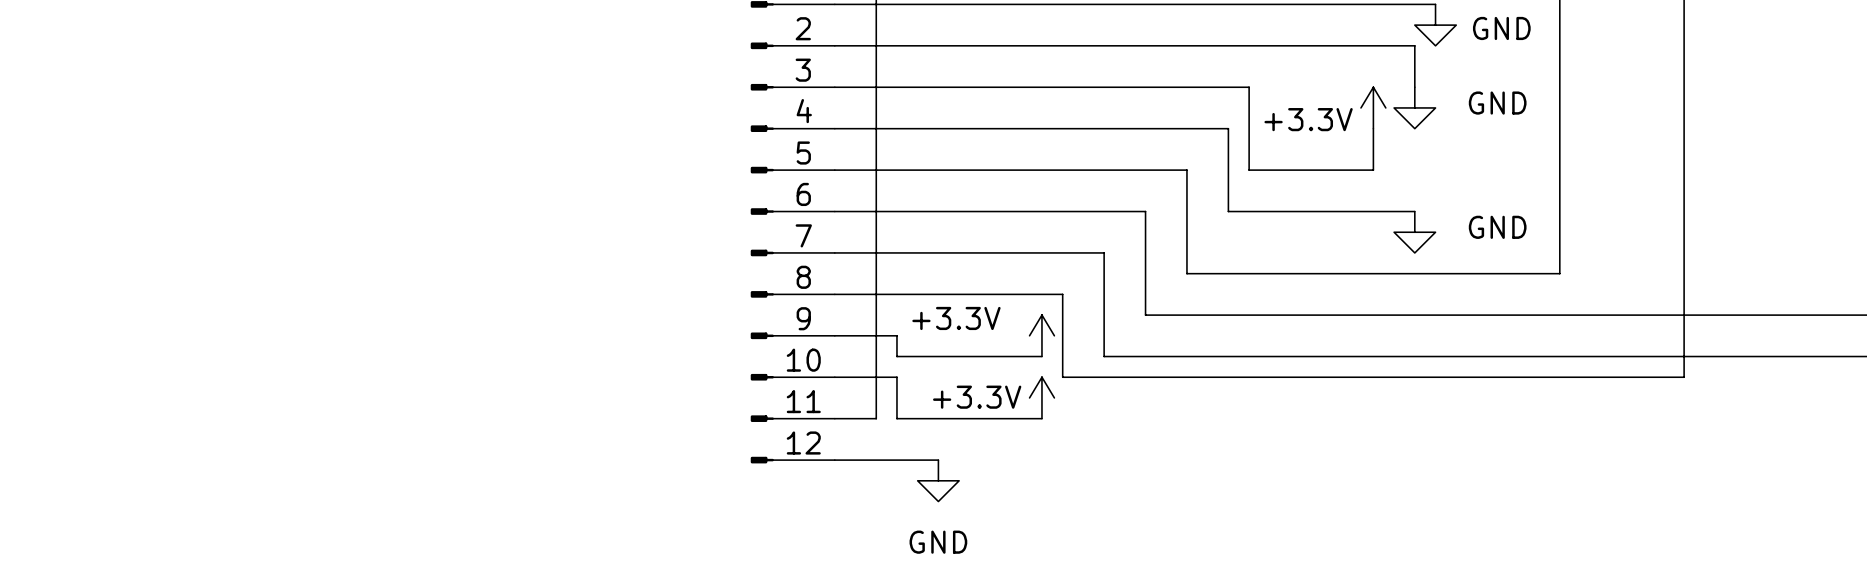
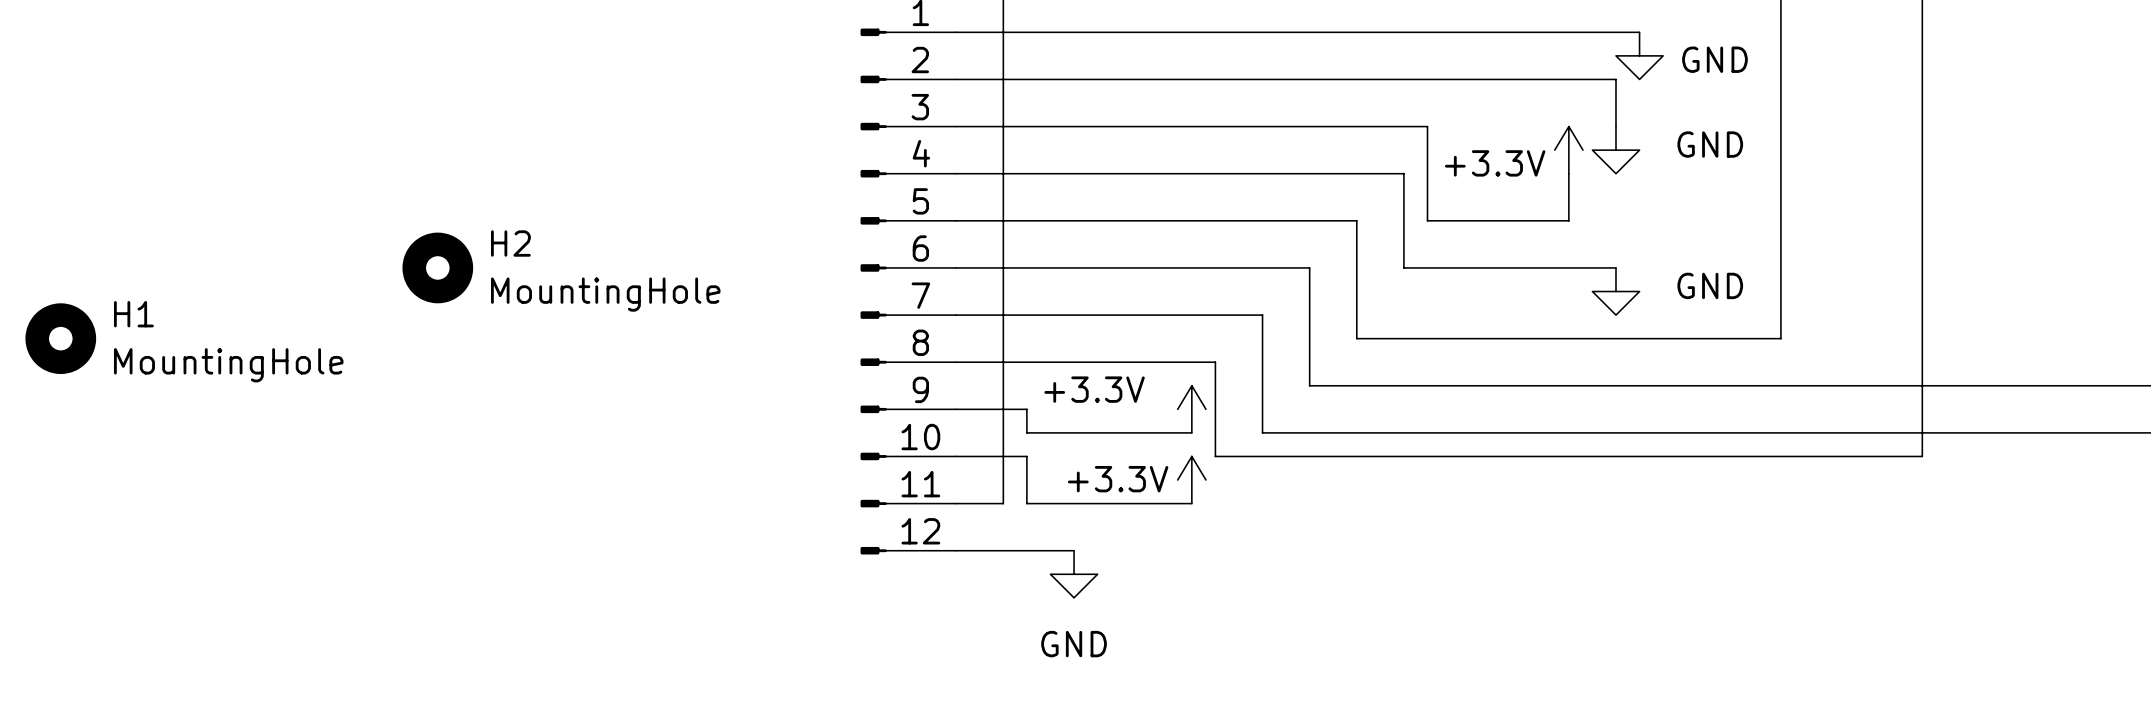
H2: none -> MountingHole (437, 267)
H1: none -> MountingHole (60, 338)

